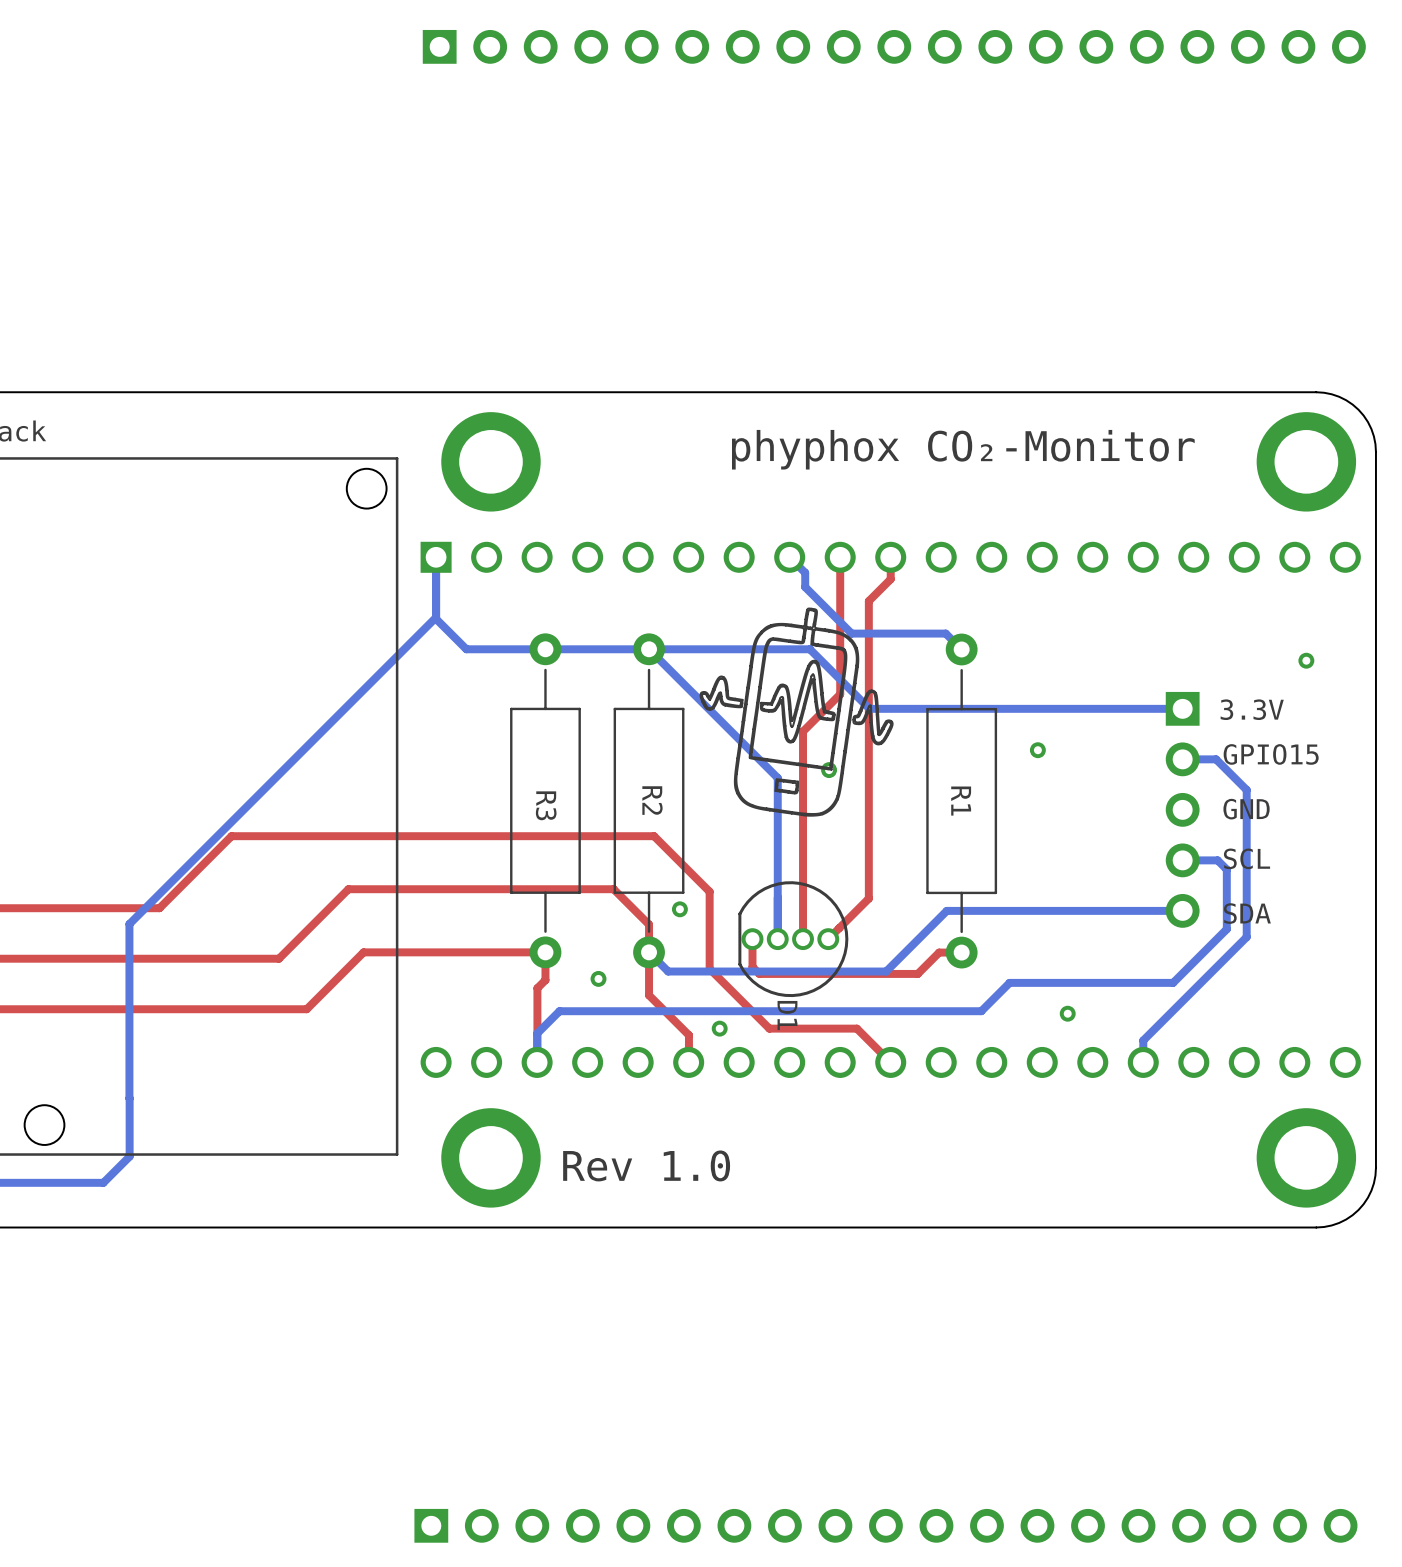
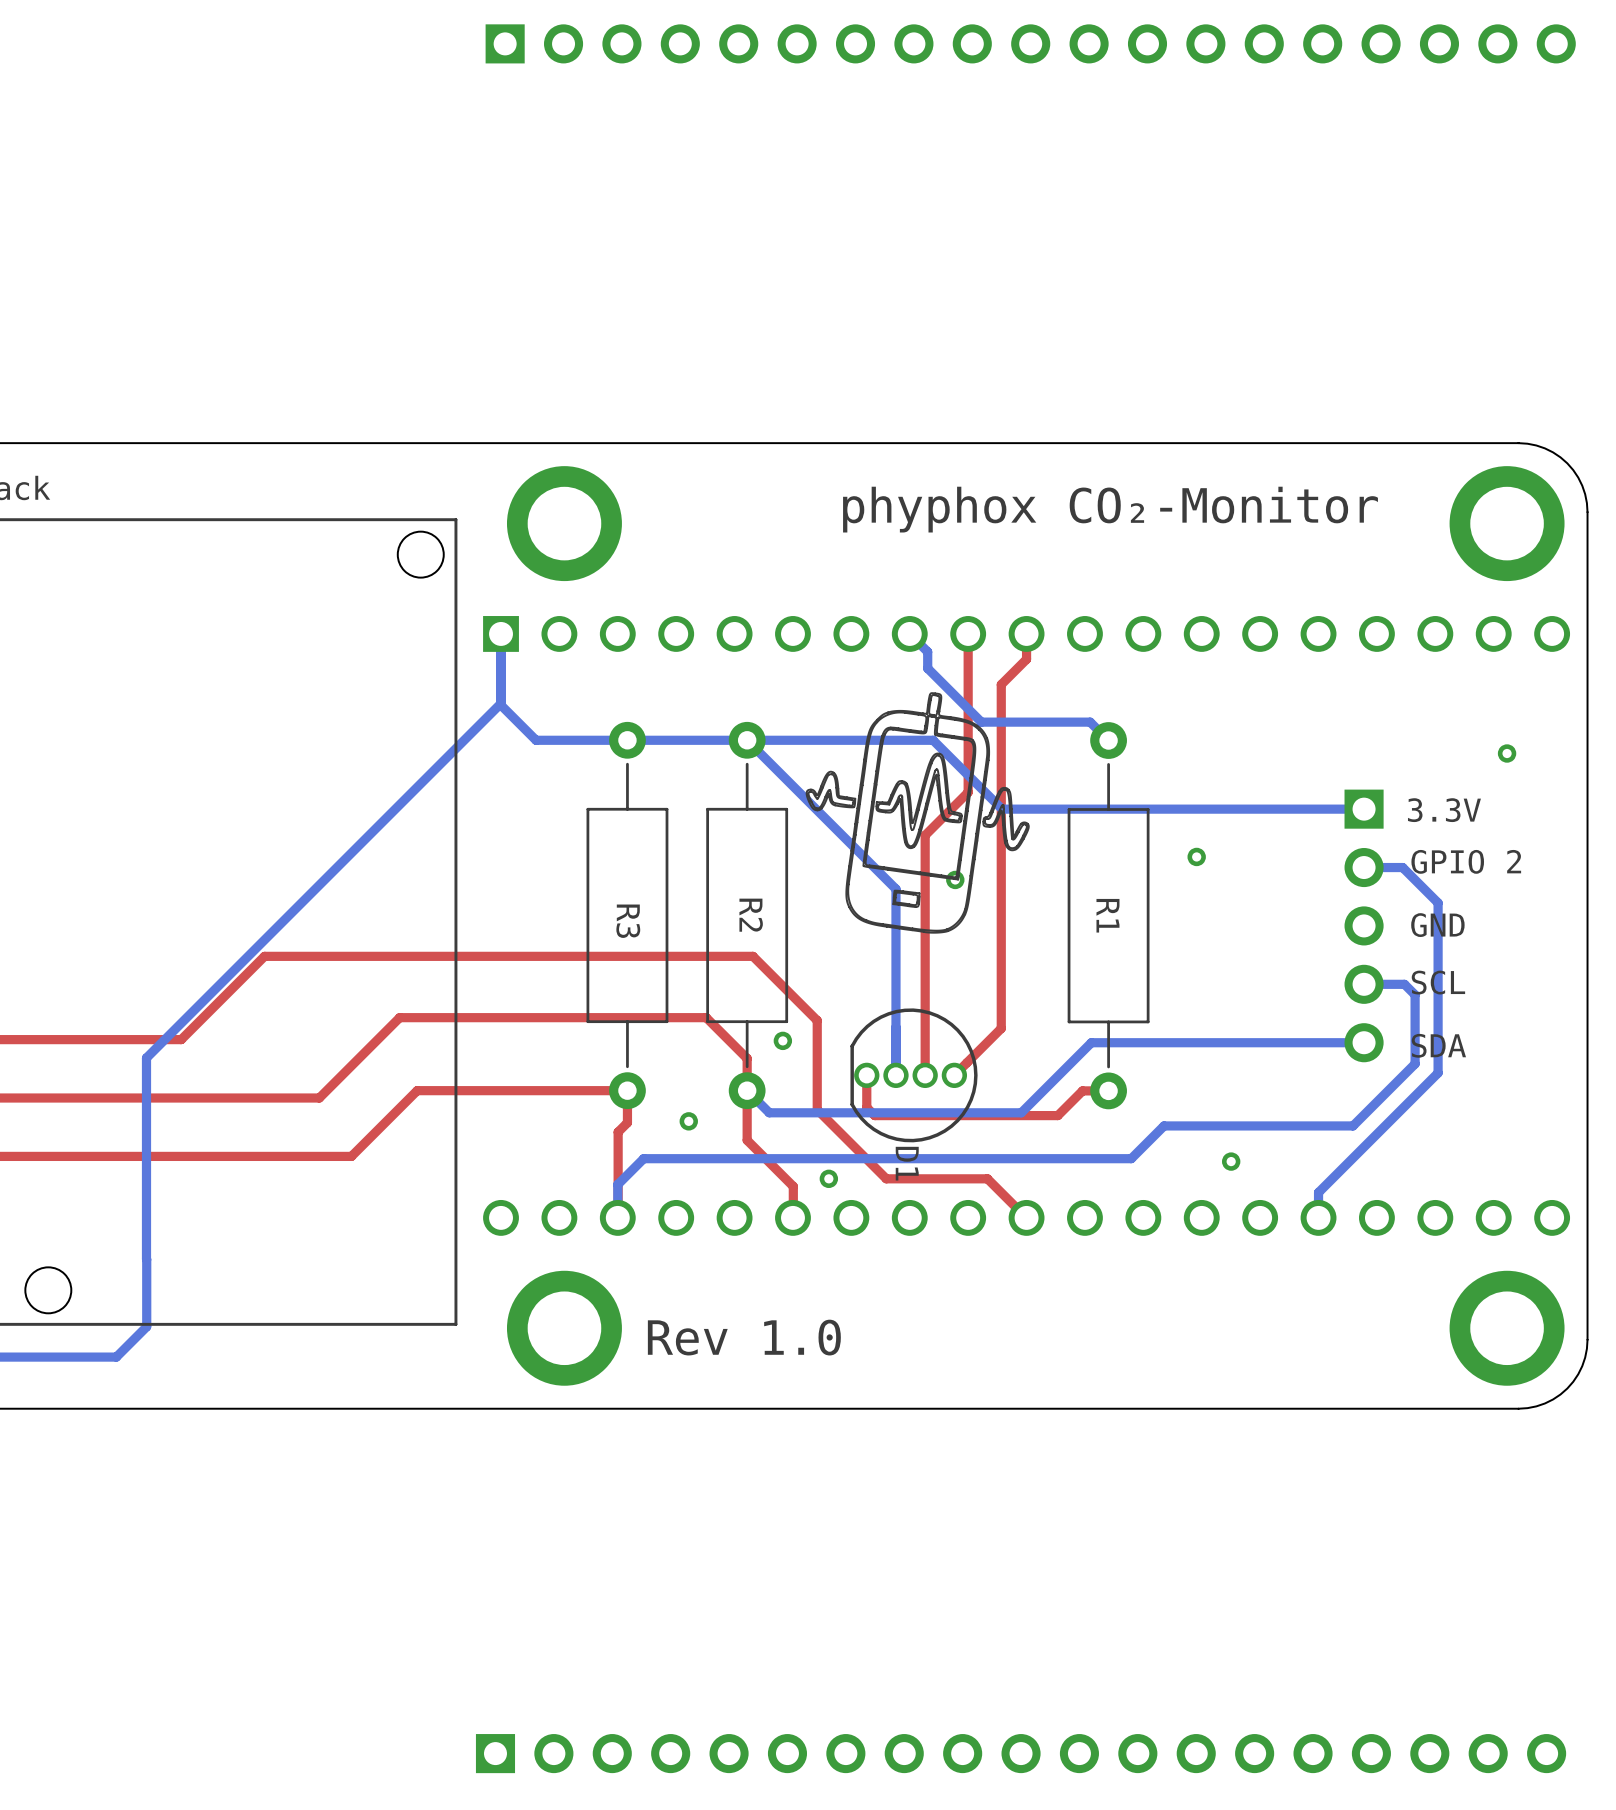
text: GPIO15 (1271, 754) -> GPIO 2 (1466, 861)

